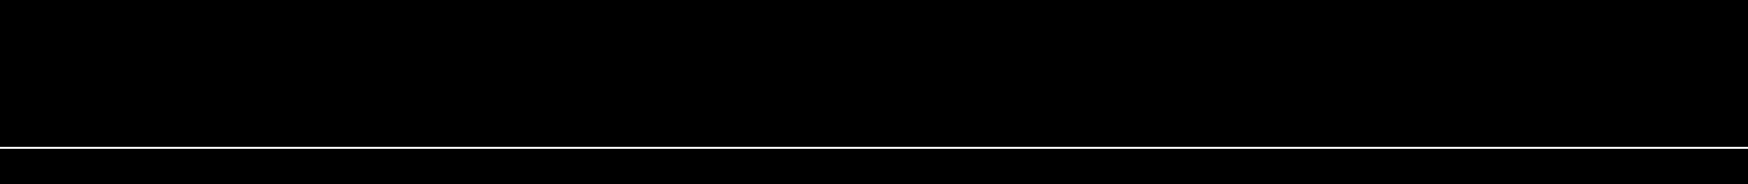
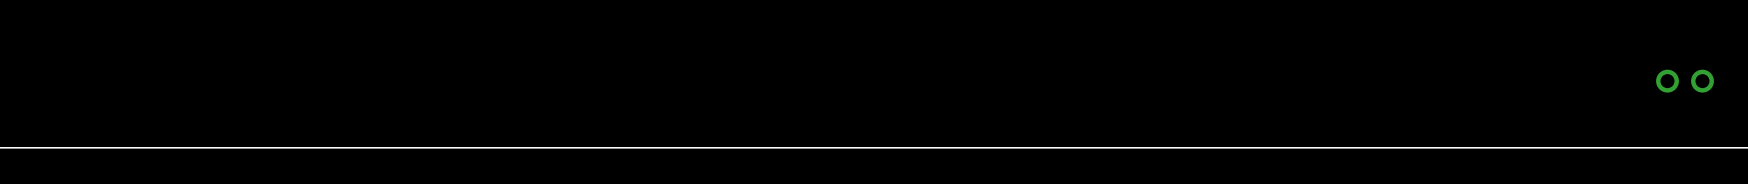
part: none -> (1684, 81)

